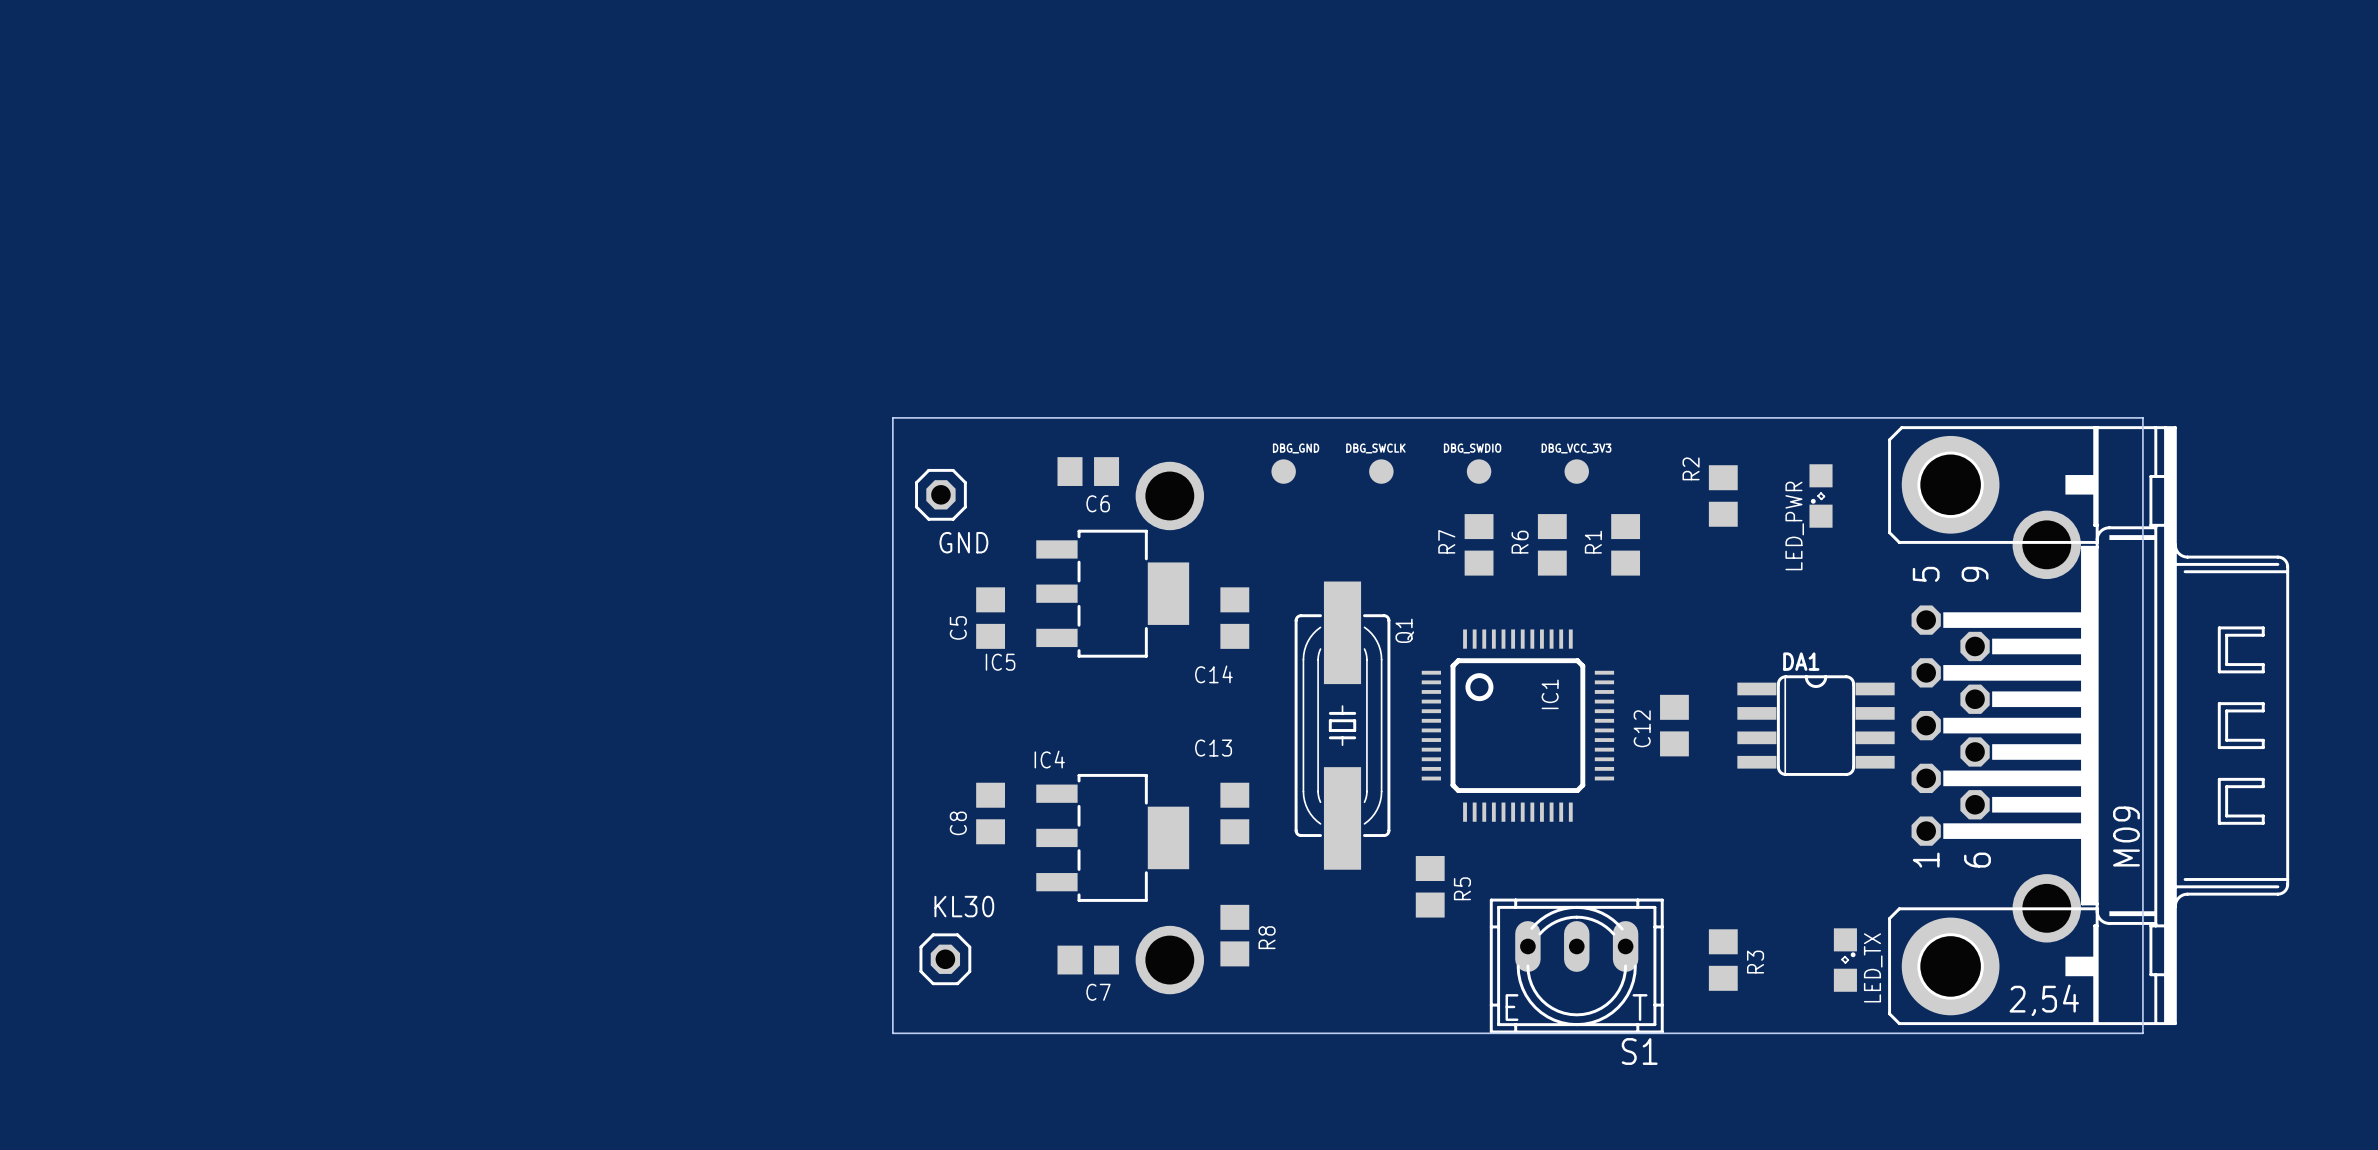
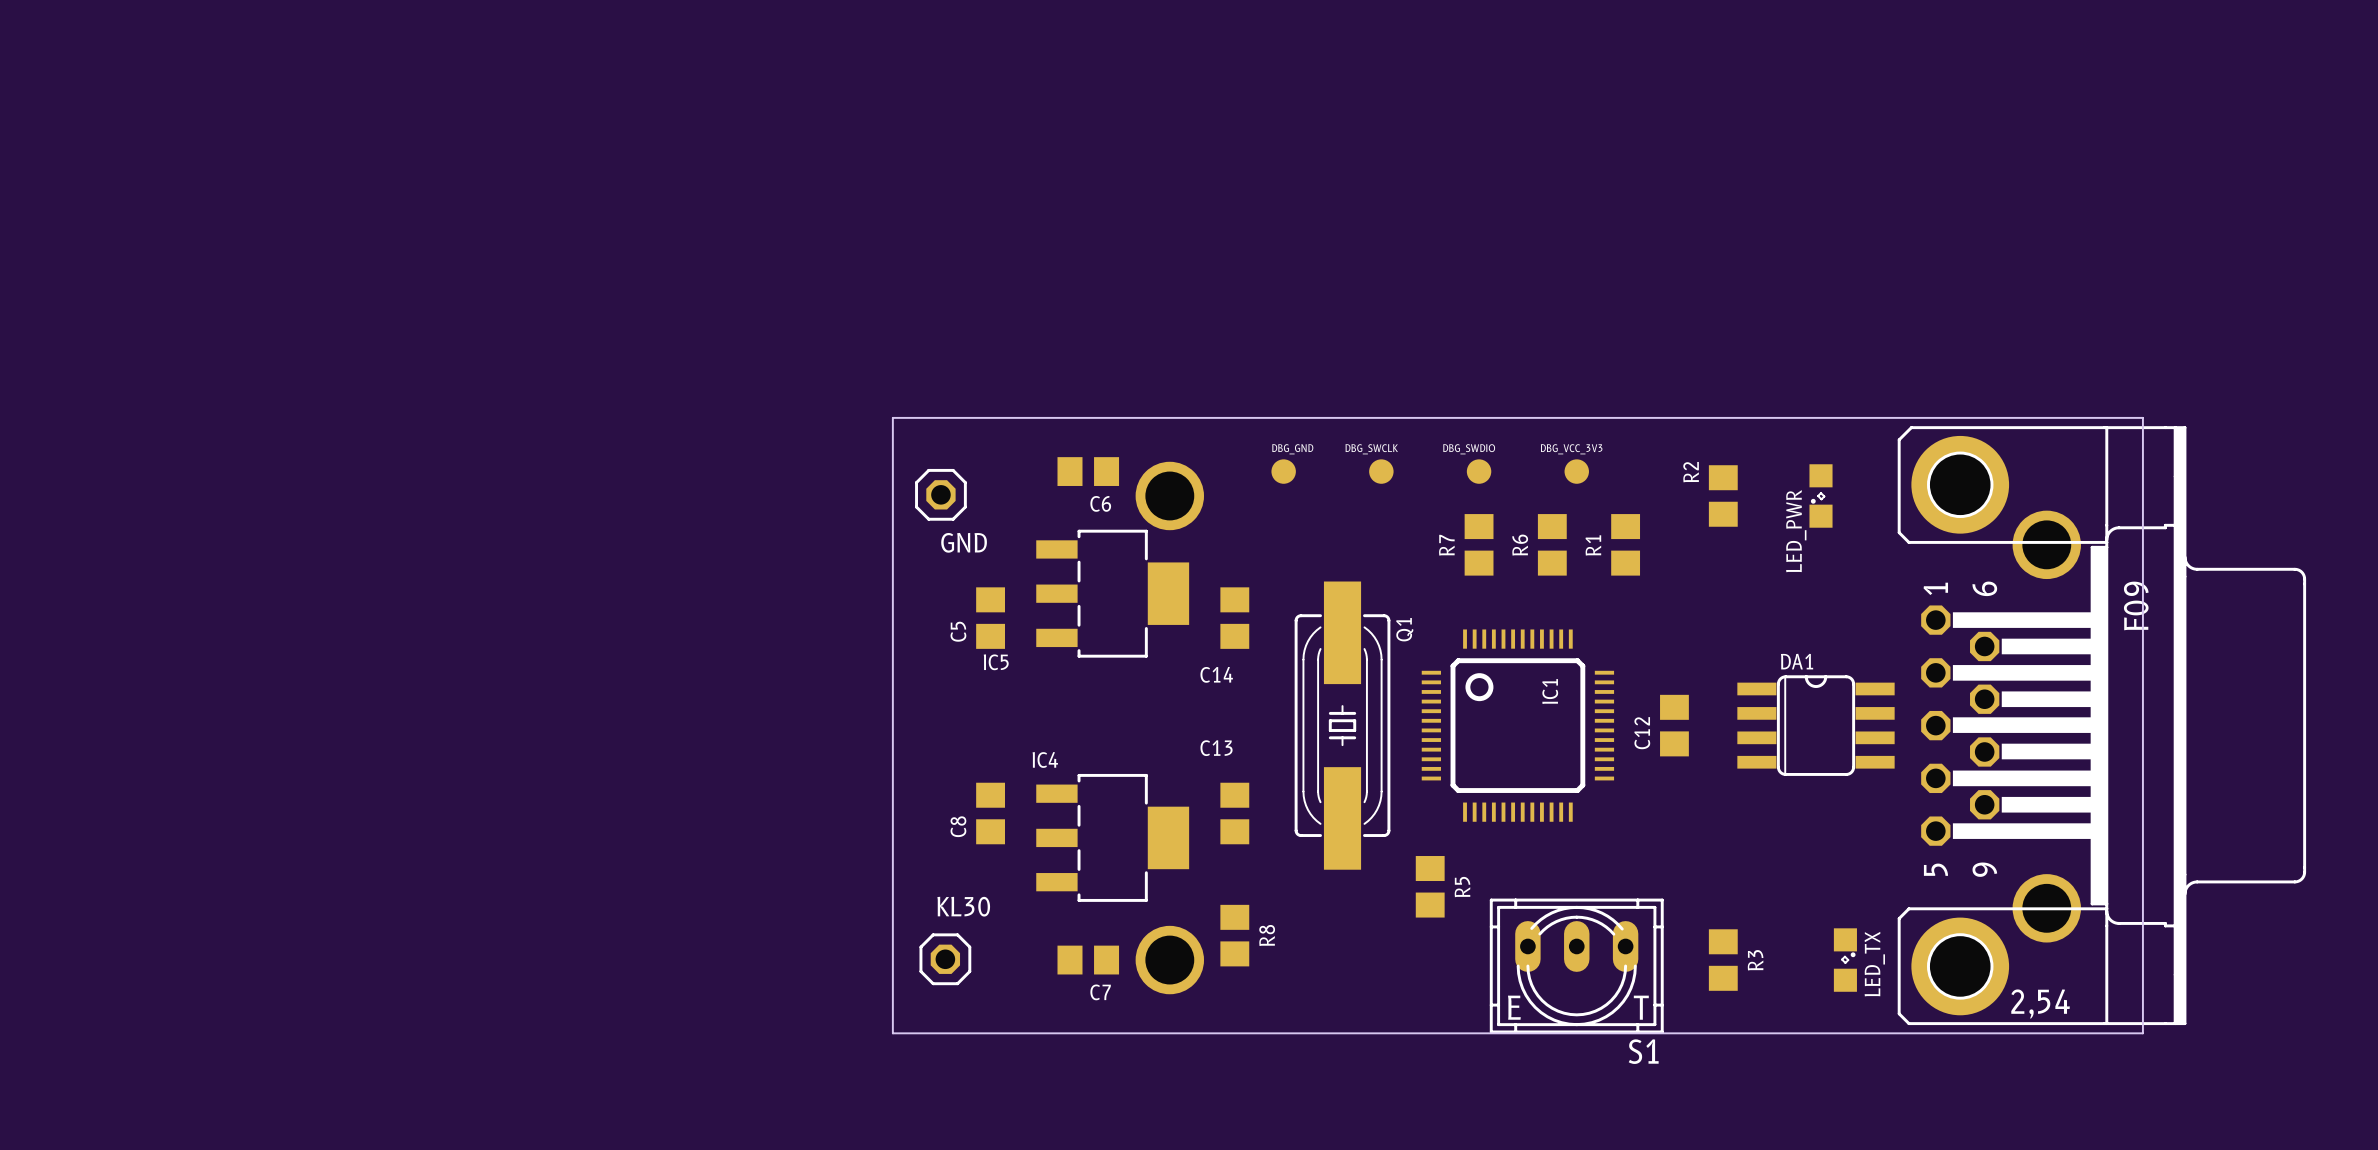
part footprint: [1888, 426, 2290, 1026] -> [1897, 426, 2307, 1026]

